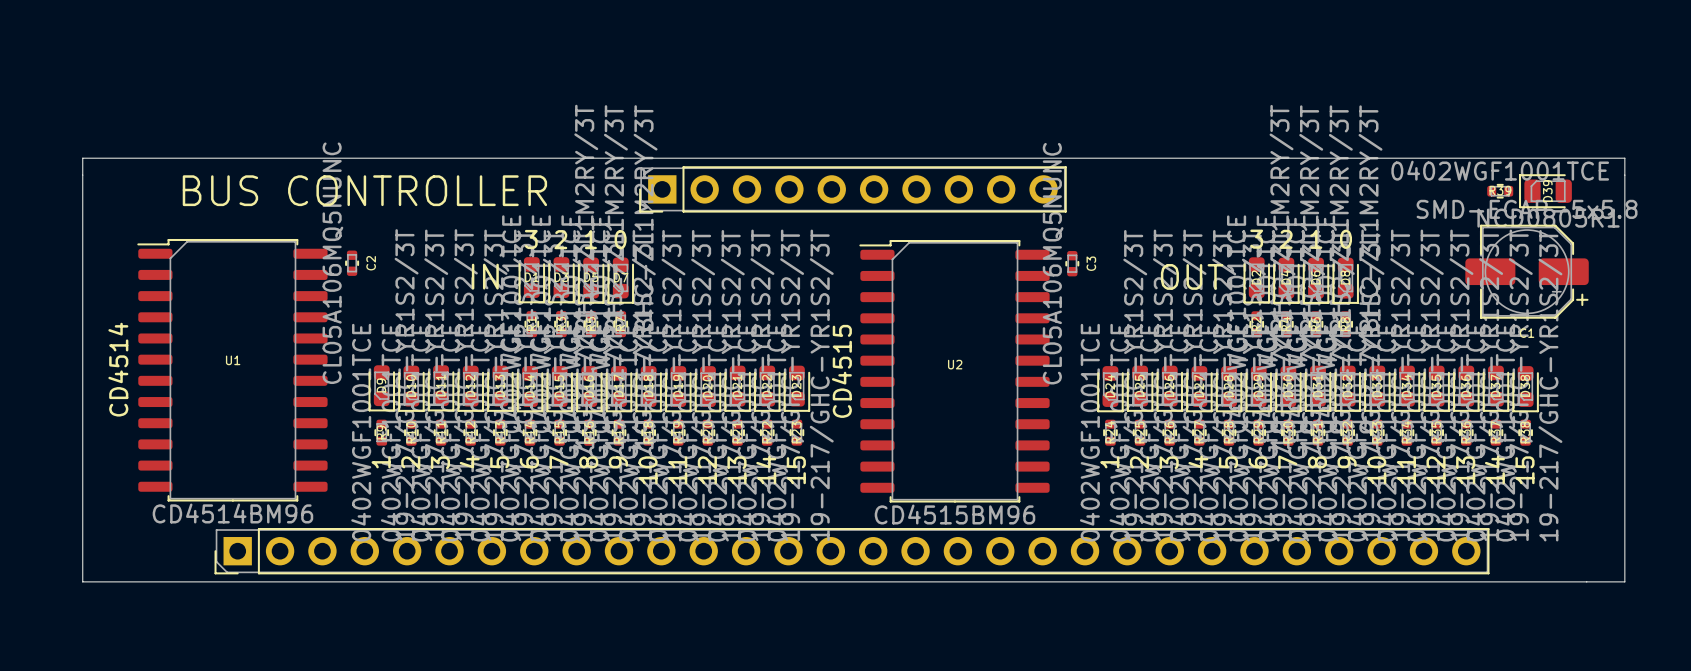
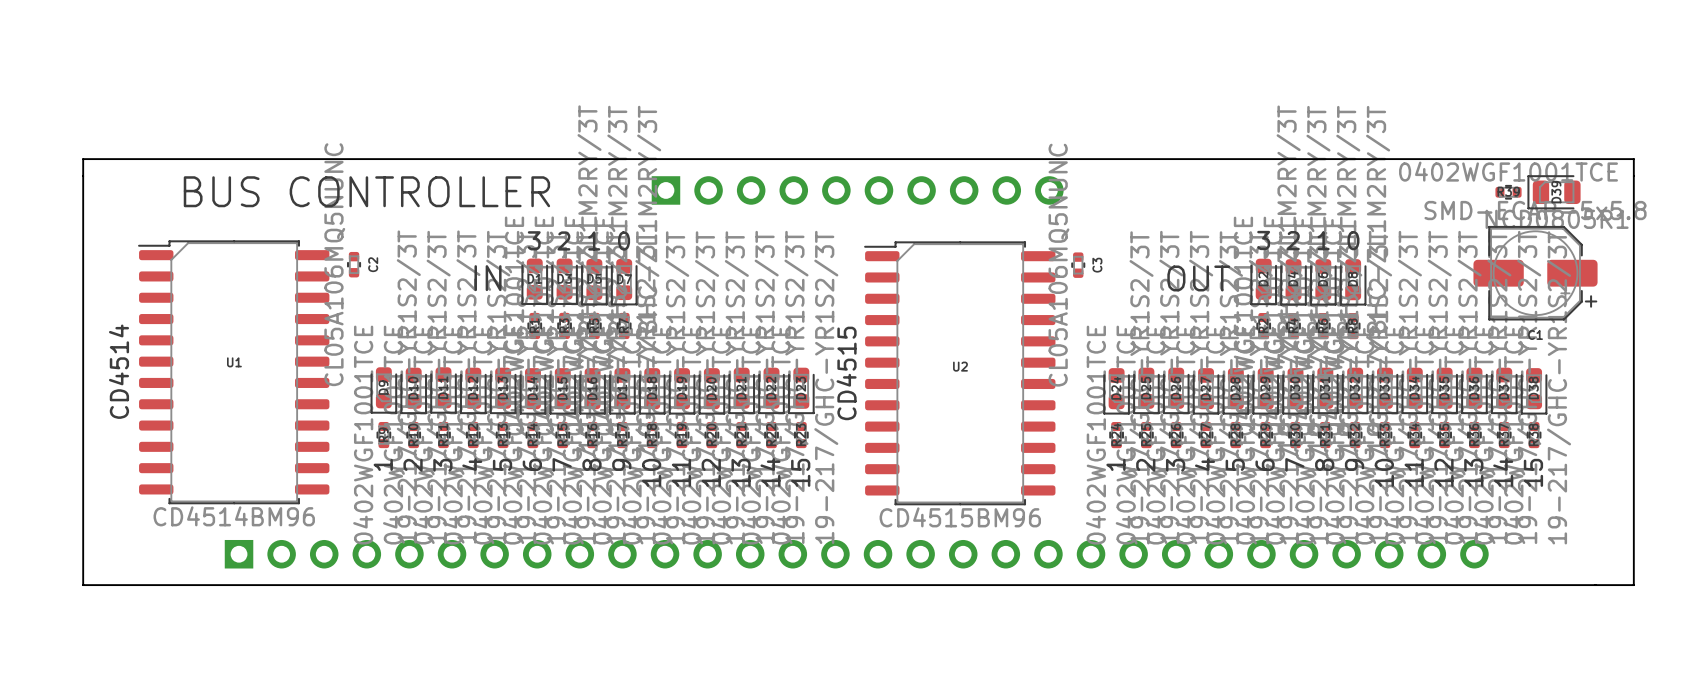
part side: top (852, 189) -> bottom (857, 190)
part side: top (852, 551) -> bottom (856, 554)

